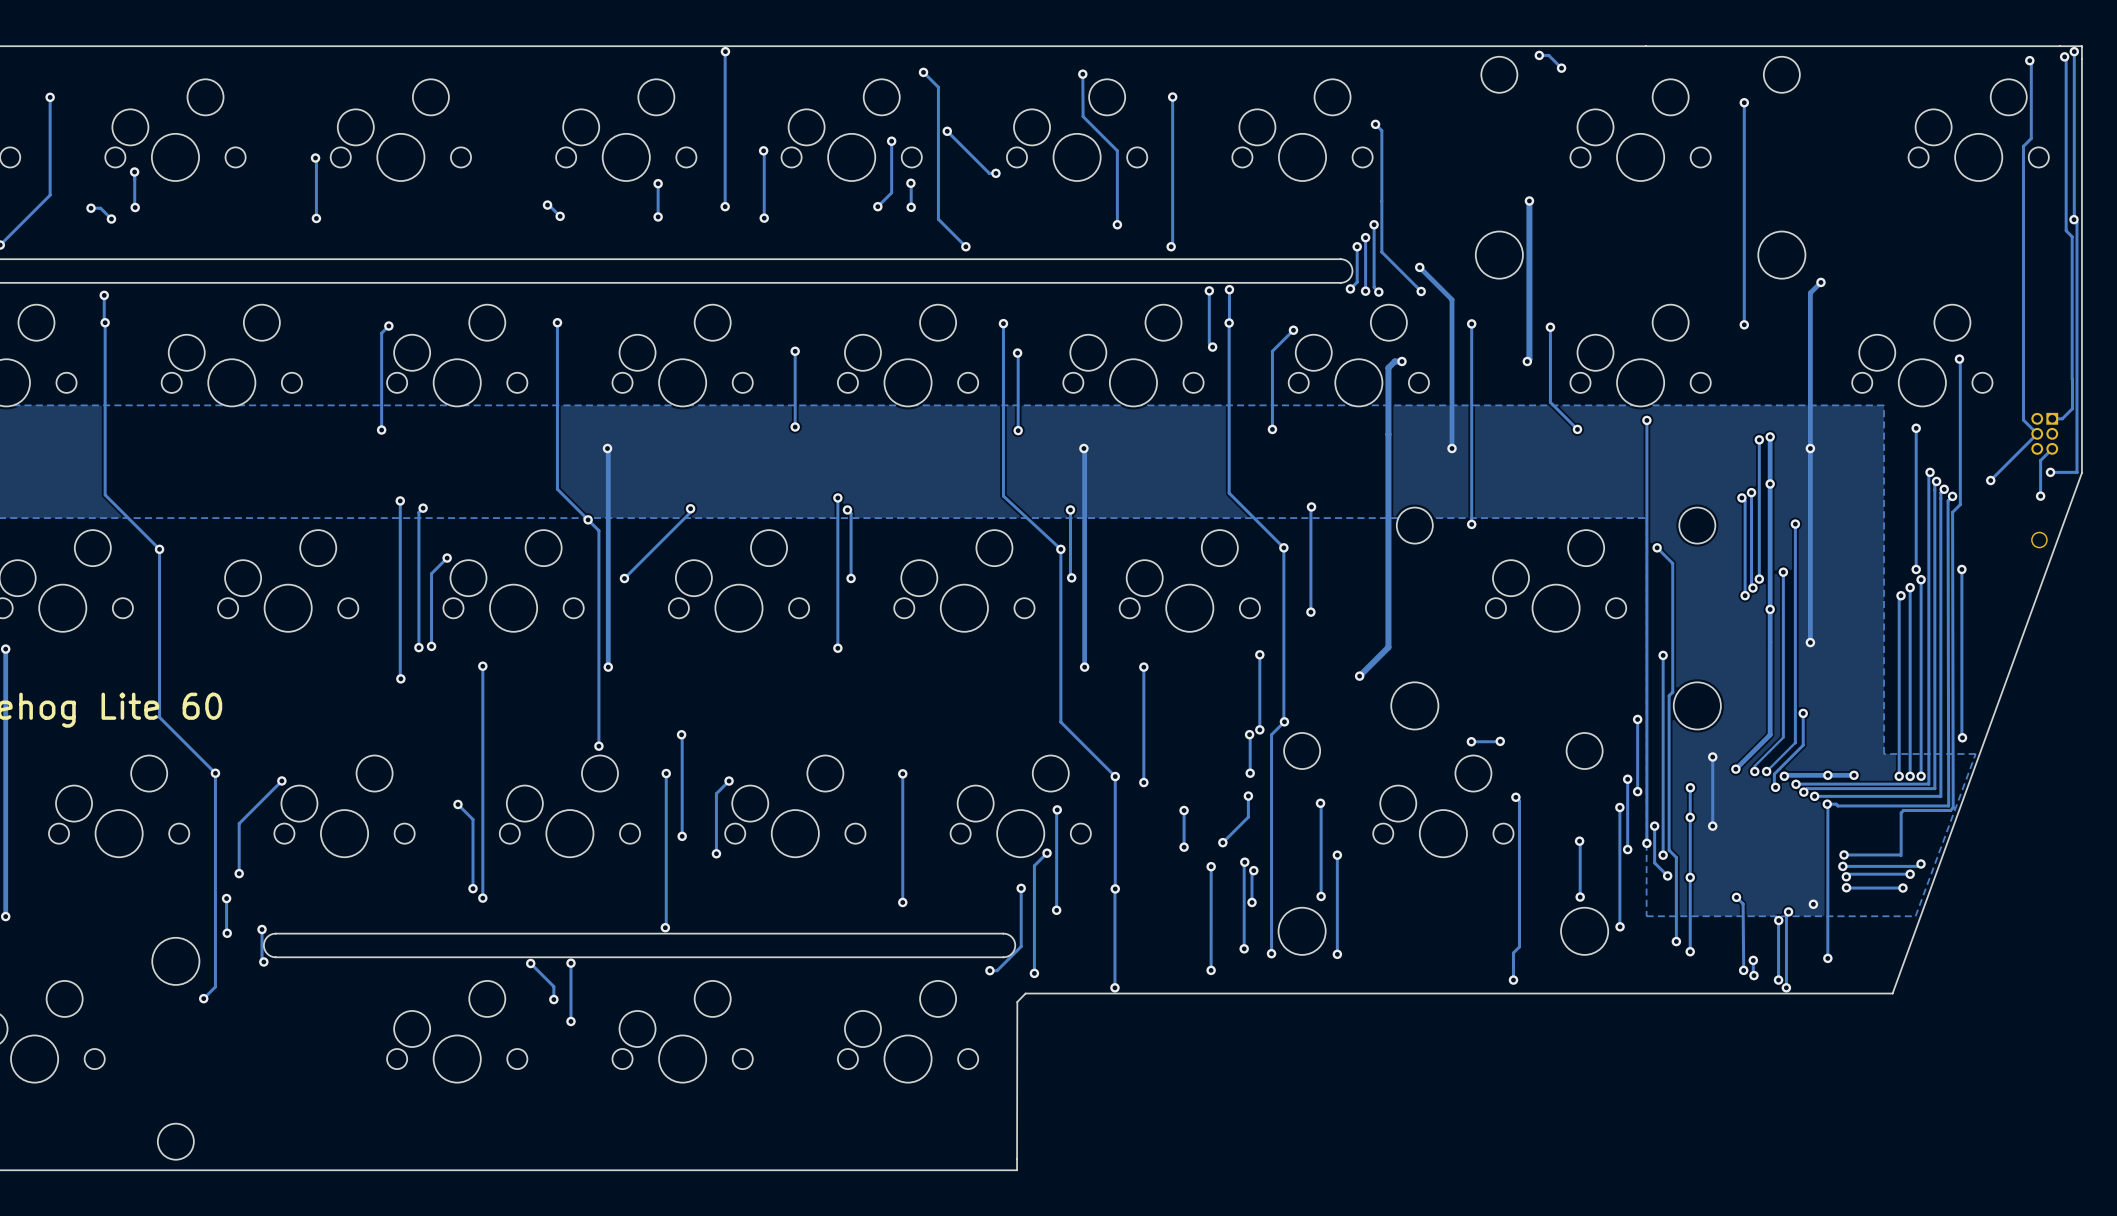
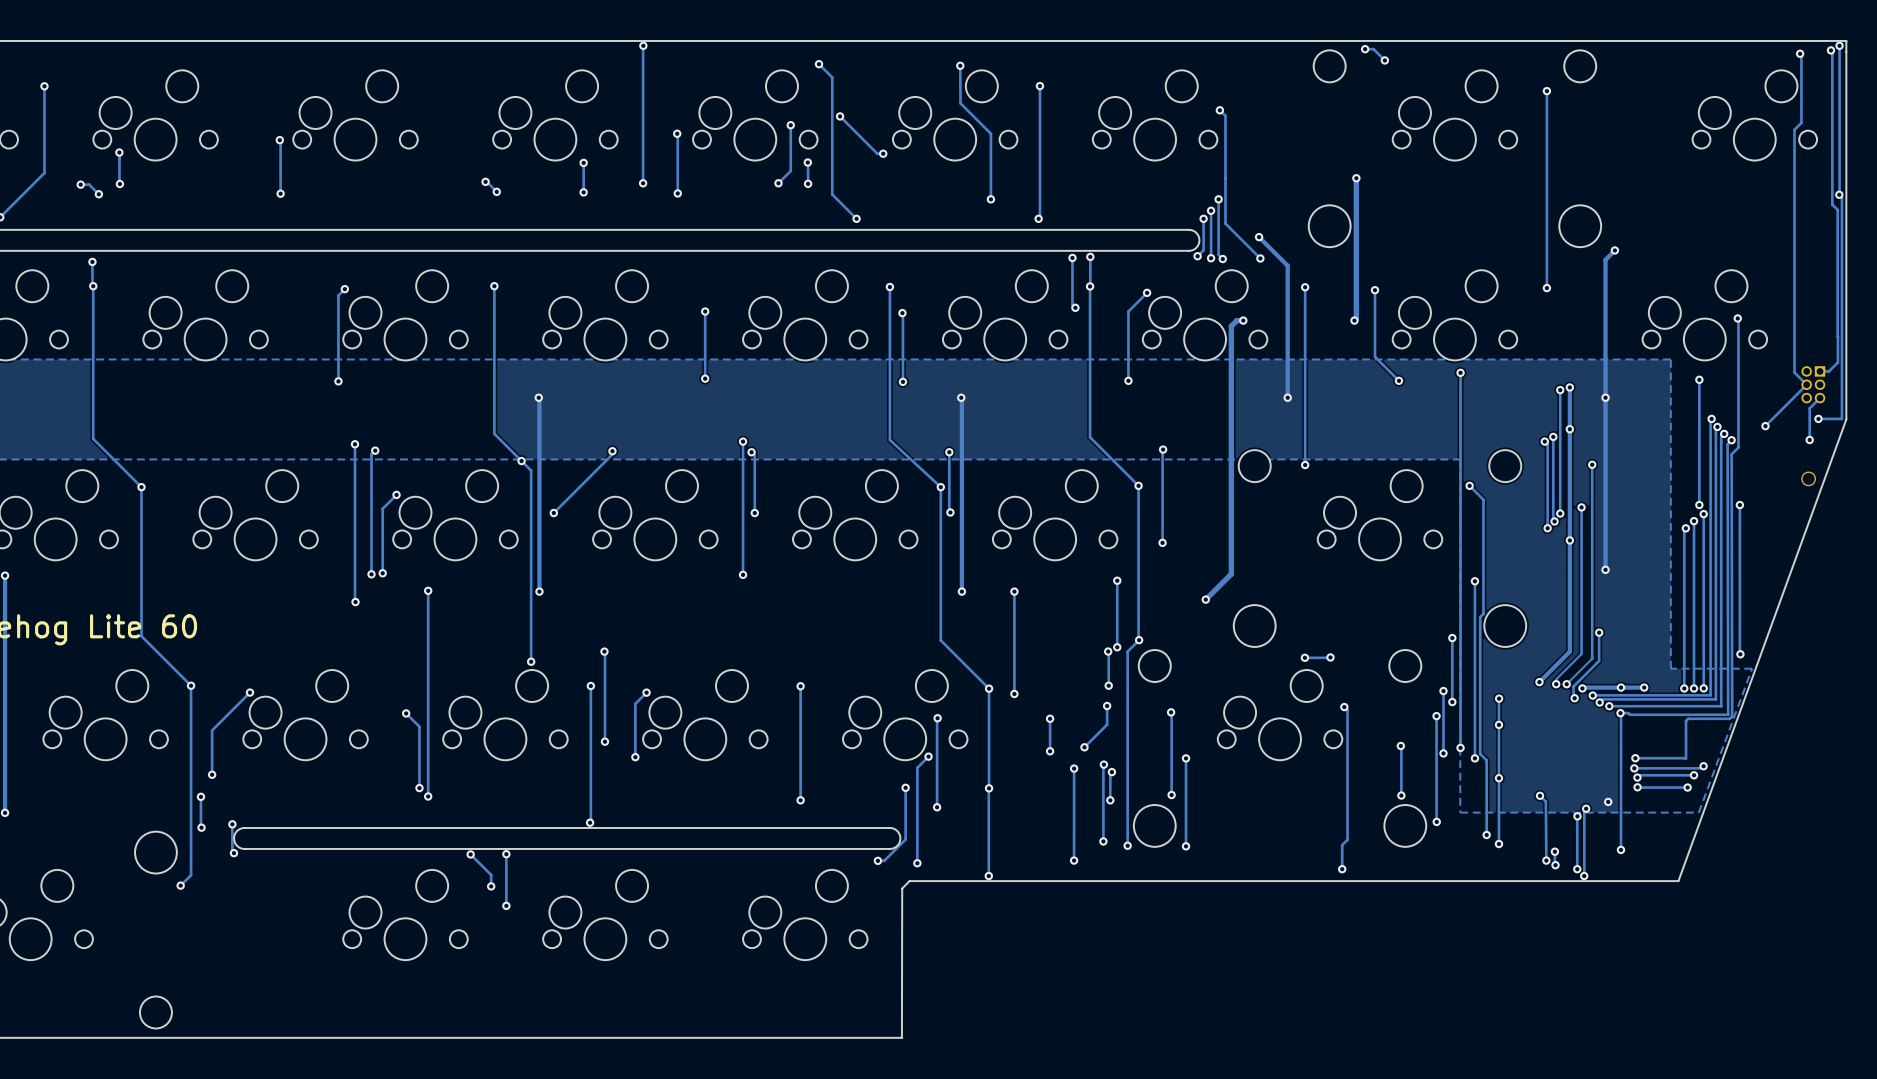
track: (1712, 757) (1712, 826) -> none
via: (1712, 757) -> none
track: (1654, 826) (1654, 862) (1667, 875) -> none
via: (1654, 826) -> none
via: (1712, 826) -> none
via: (1667, 875) -> none

